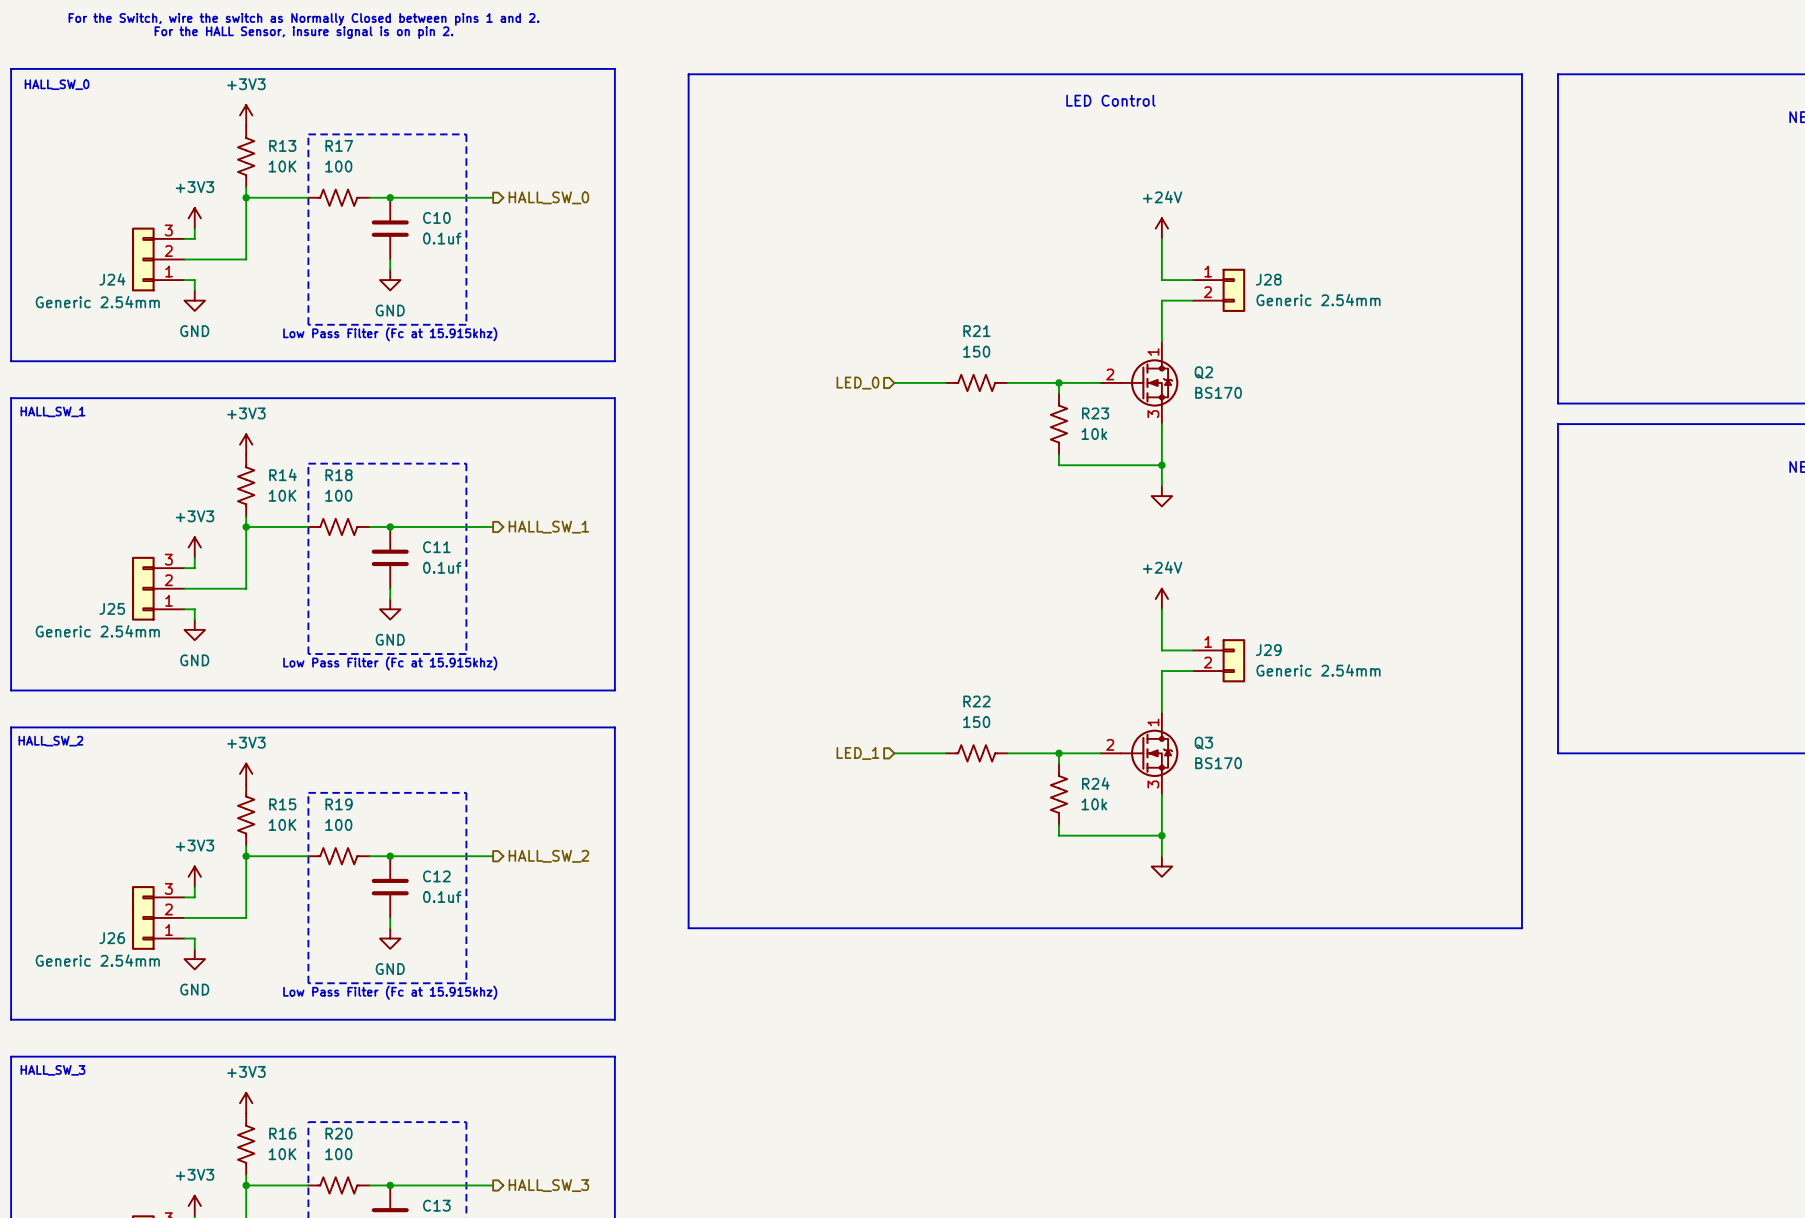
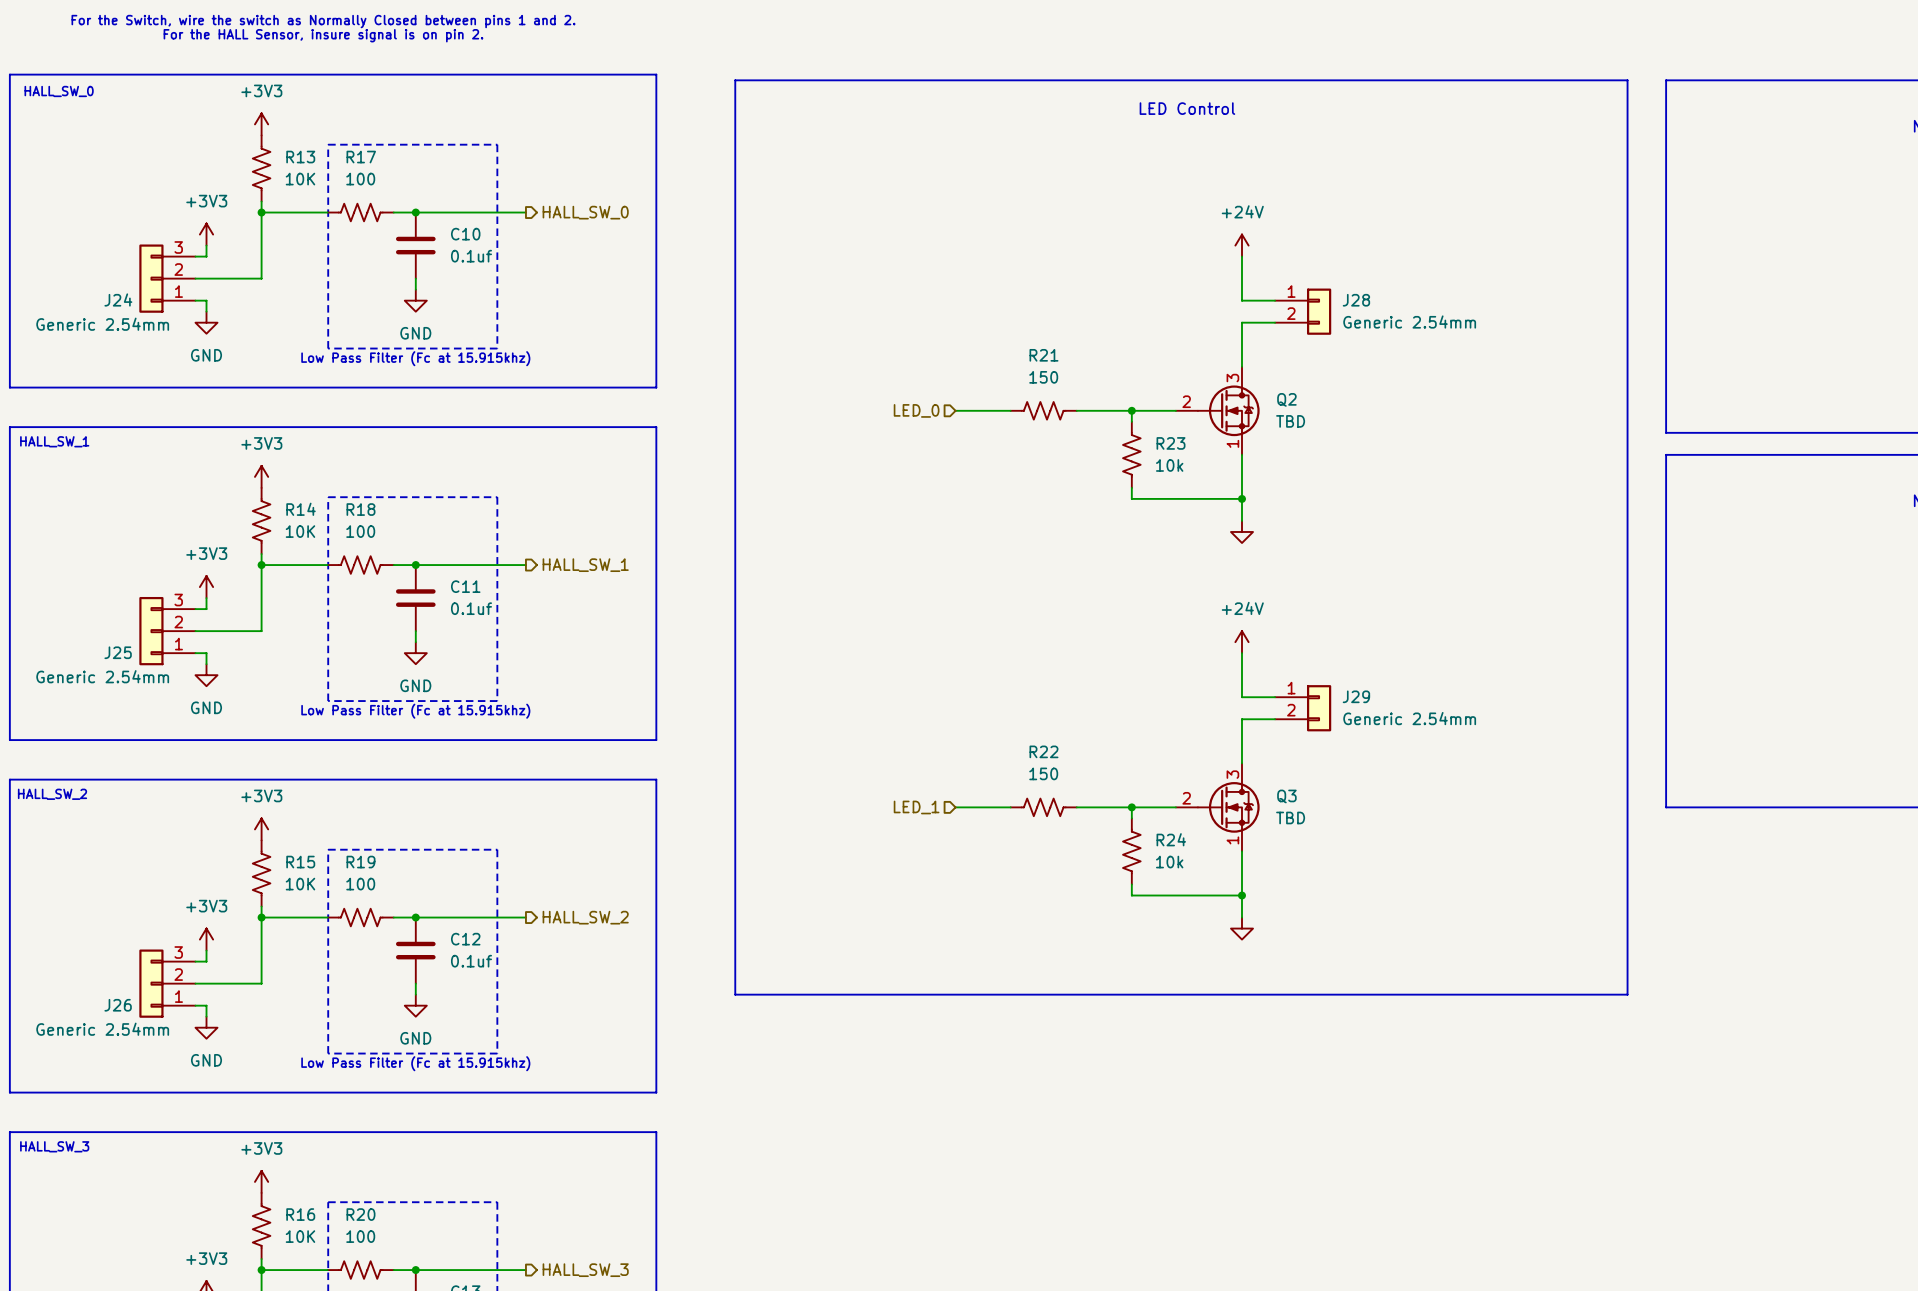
Q2 pin number: 1 (1153, 352) -> 3 (1232, 378)
Q2 value: BS170 (1218, 392) -> TBD (1290, 421)
Q2 pin number: 3 (1153, 414) -> 1 (1232, 443)
Q3 pin number: 1 (1153, 722) -> 3 (1232, 774)
Q3 value: BS170 (1218, 763) -> TBD (1290, 817)
Q3 pin number: 3 (1153, 784) -> 1 (1232, 840)

